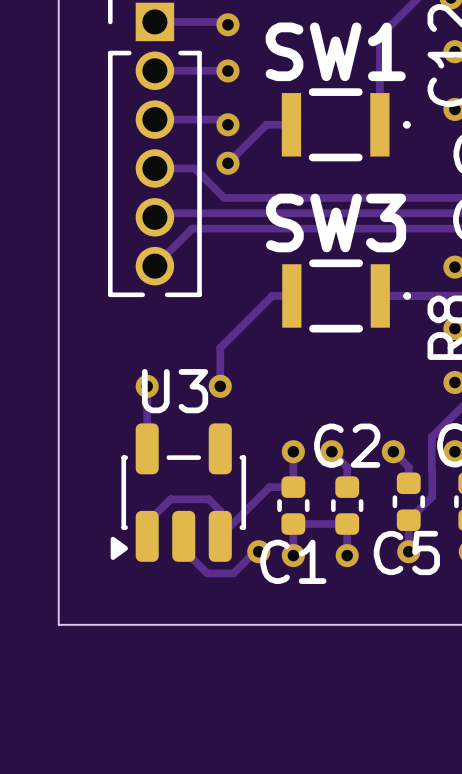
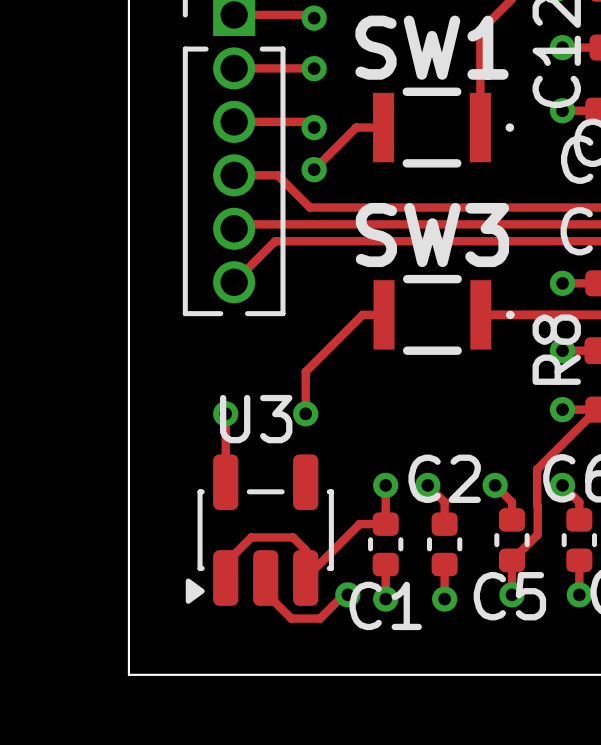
track: (293, 524) (347, 524) -> none

